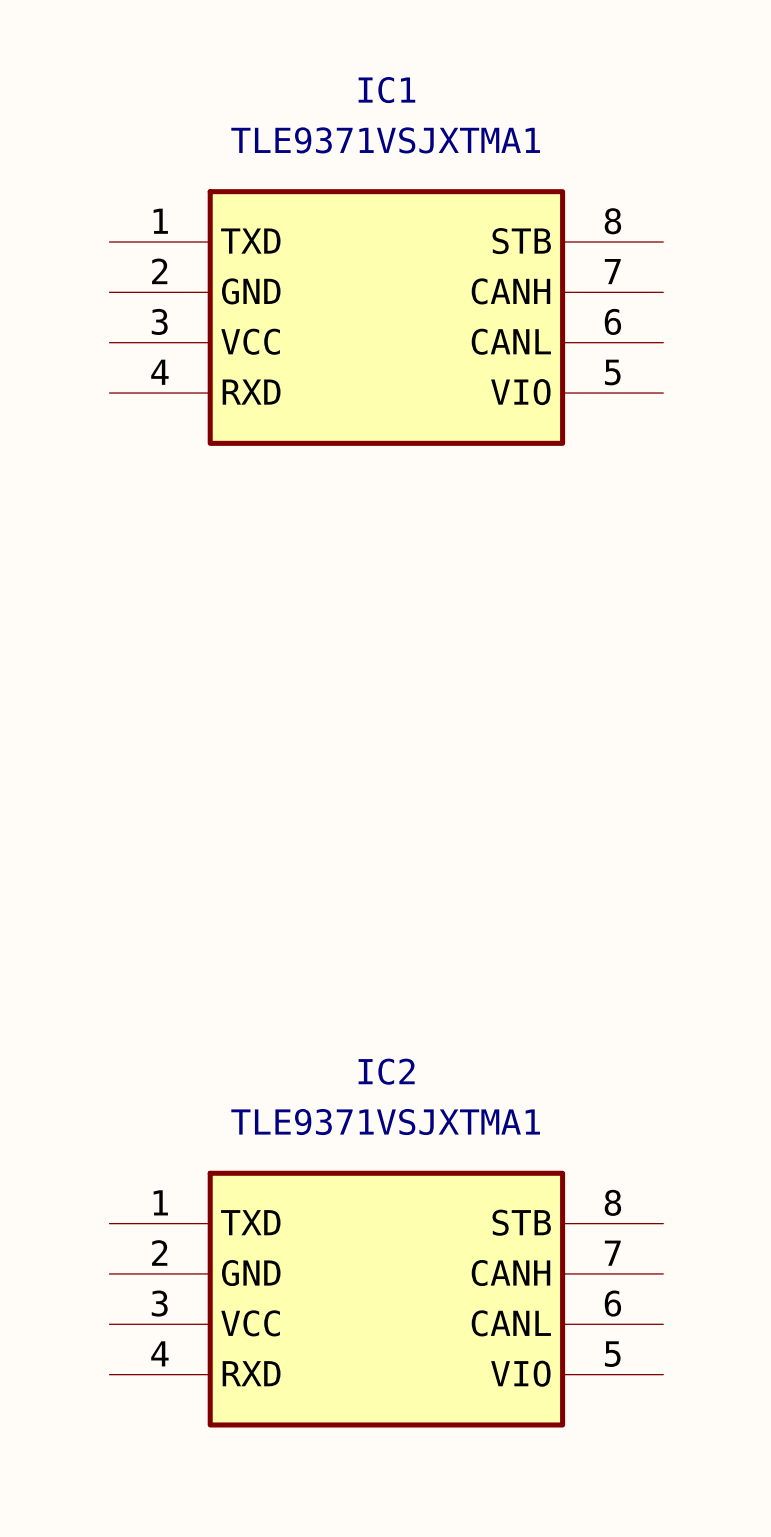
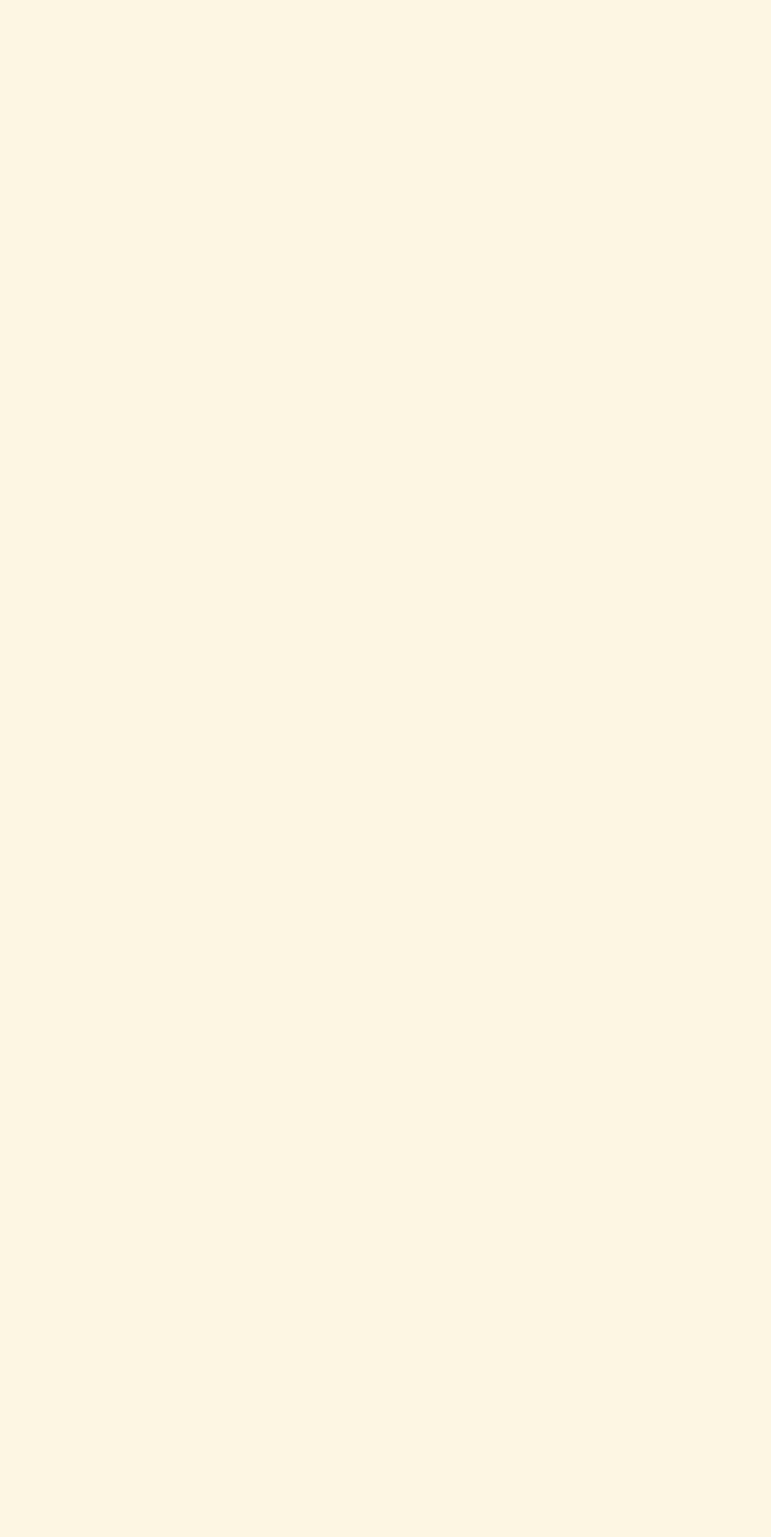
IC1: TLE9371VSJXTMA1 (386, 317) -> none
IC2: TLE9371VSJXTMA1 (386, 1299) -> none

